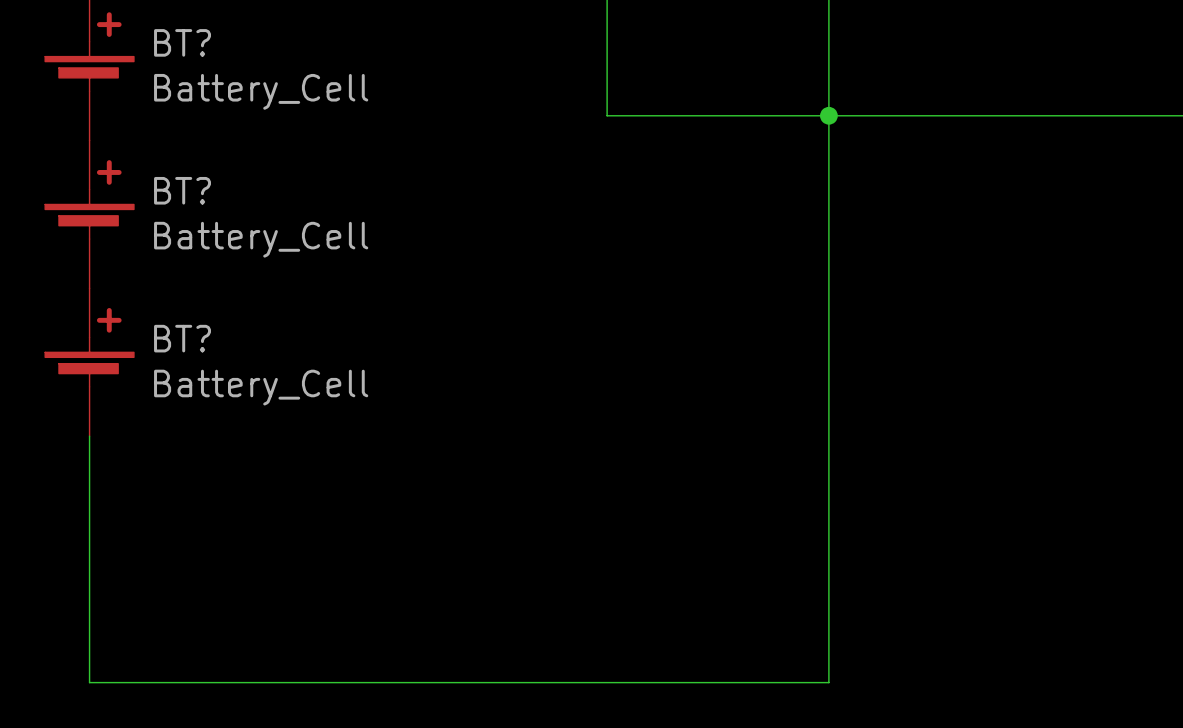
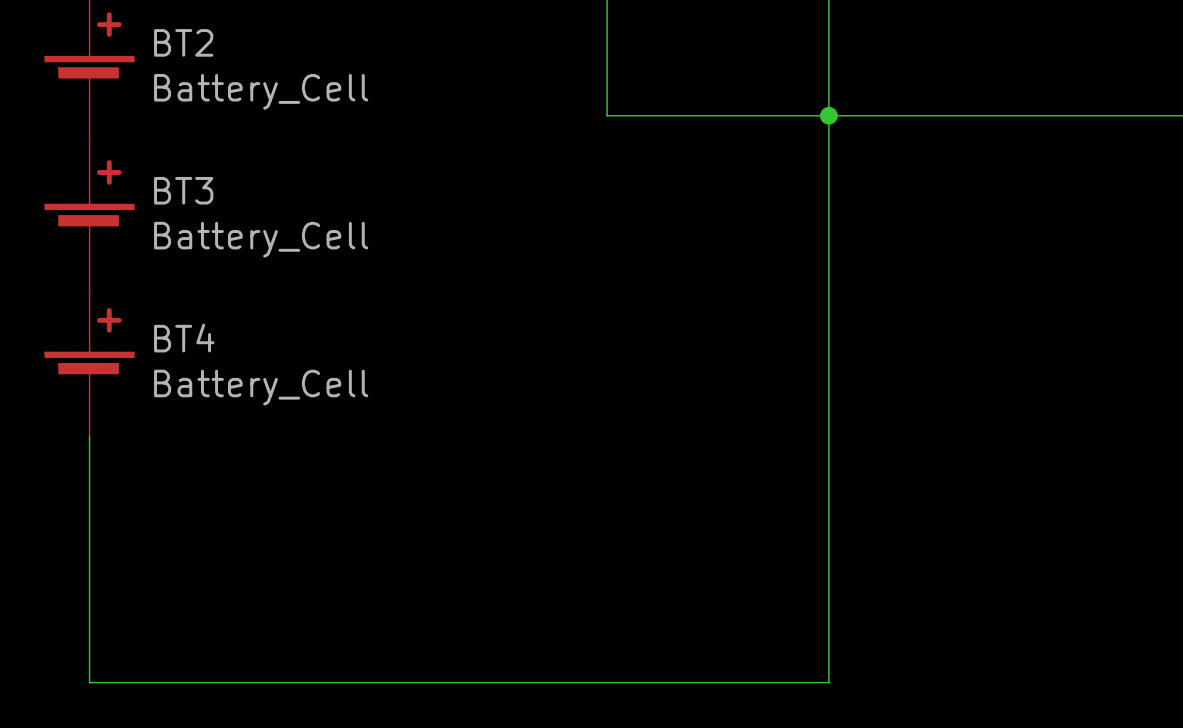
BT? name: BT? (182, 42) -> BT2 (183, 42)
BT? name: BT? (182, 190) -> BT3 (183, 190)
BT? name: BT? (182, 338) -> BT4 (184, 338)

